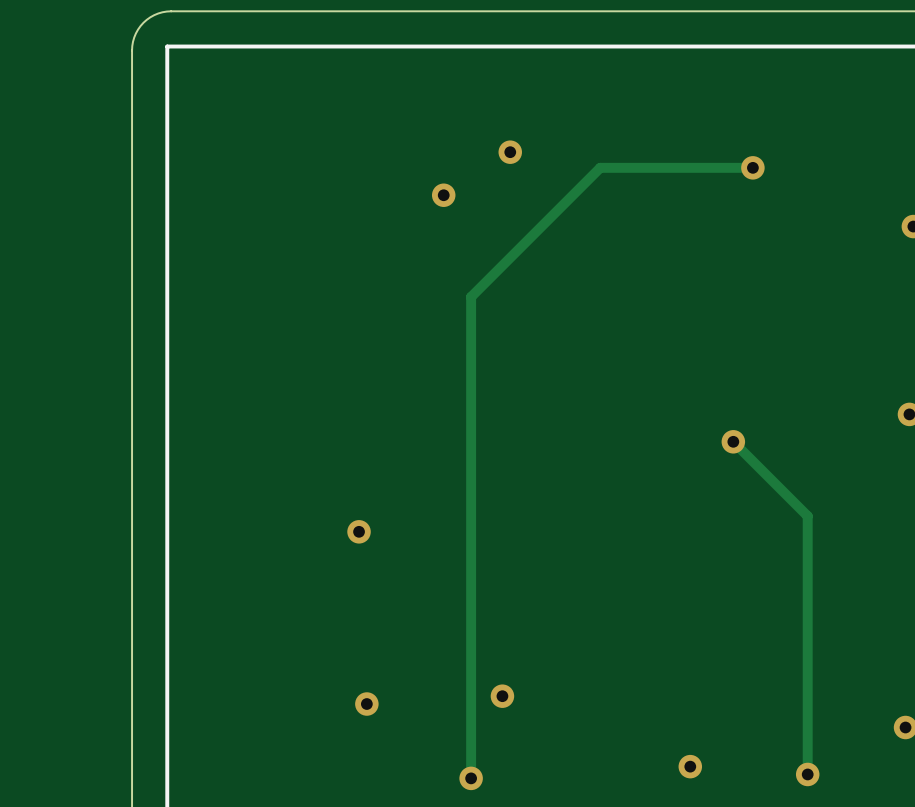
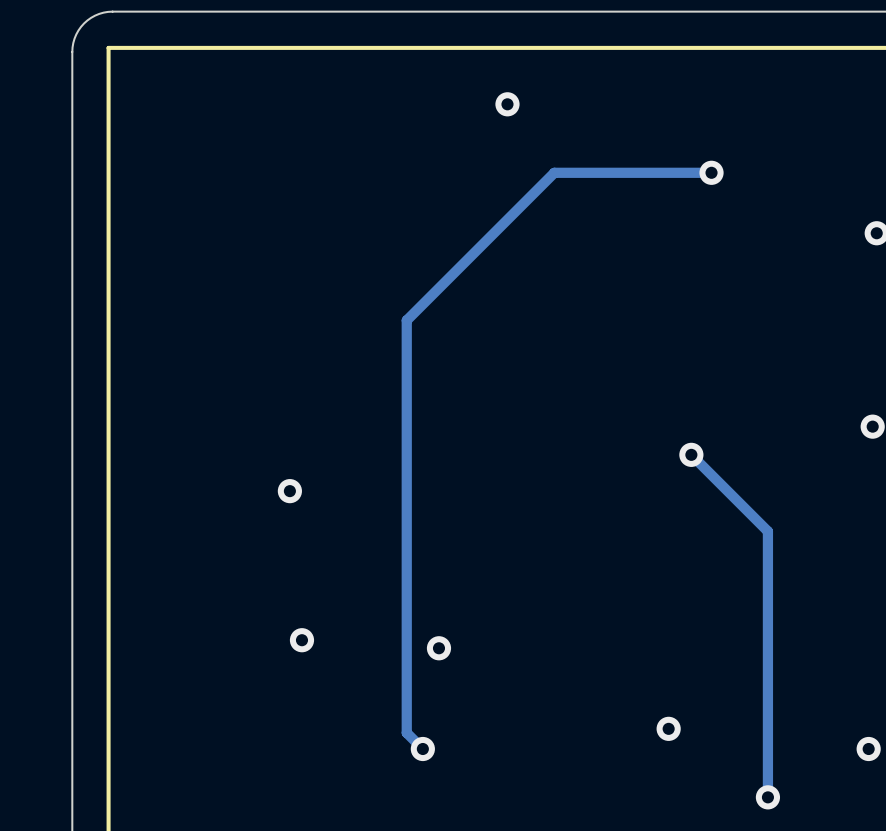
via position: (510, 152) -> (507, 104)
via: (443, 195) -> none
track: (471, 296) (471, 778) -> (421, 305) (406, 320) (406, 732) (422, 749)
via: none -> (289, 491)
via: (359, 531) -> none
via: none -> (301, 640)
via: none -> (438, 648)
via: (502, 696) -> none
via: (366, 704) -> none
via: none -> (422, 749)
via position: (690, 766) -> (668, 728)
via: (471, 778) -> none

